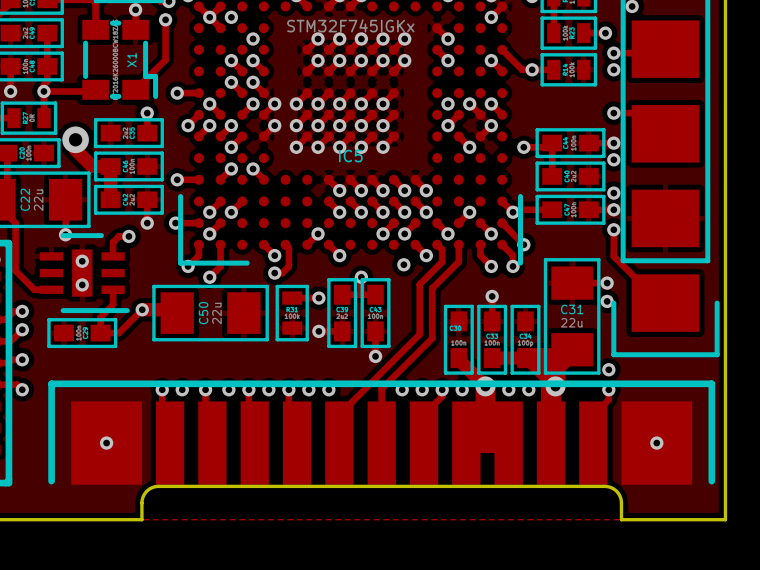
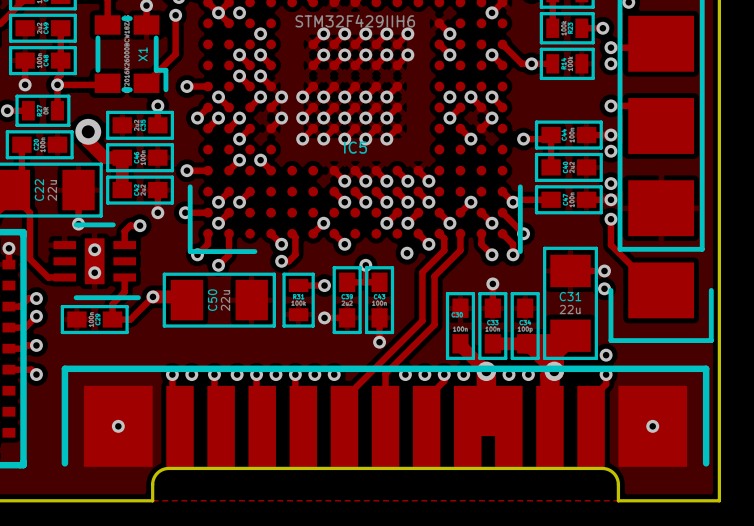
IC5 value: STM32F745IGKx (350, 25) -> STM32F429IIH6 (355, 21)

